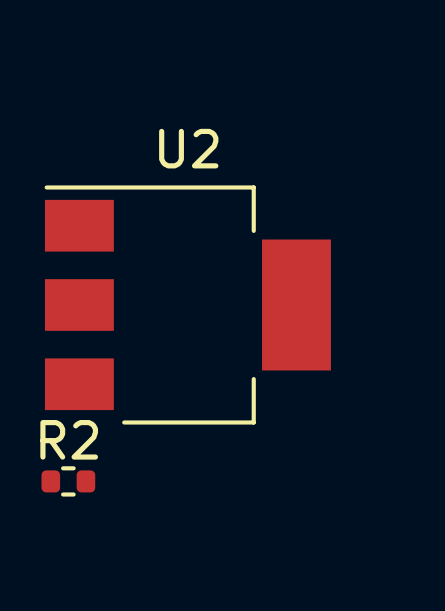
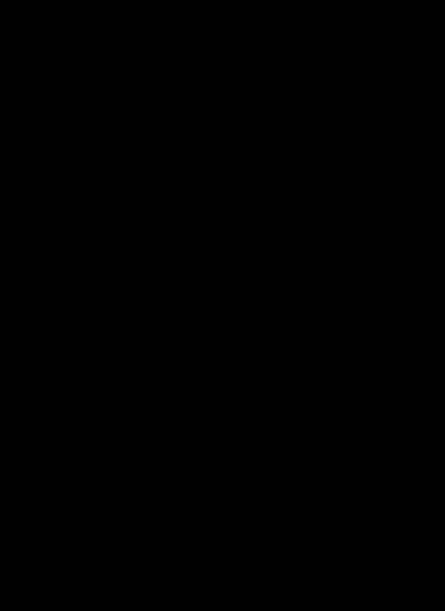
U2: (187, 304) -> none
R2: (68, 481) -> none

